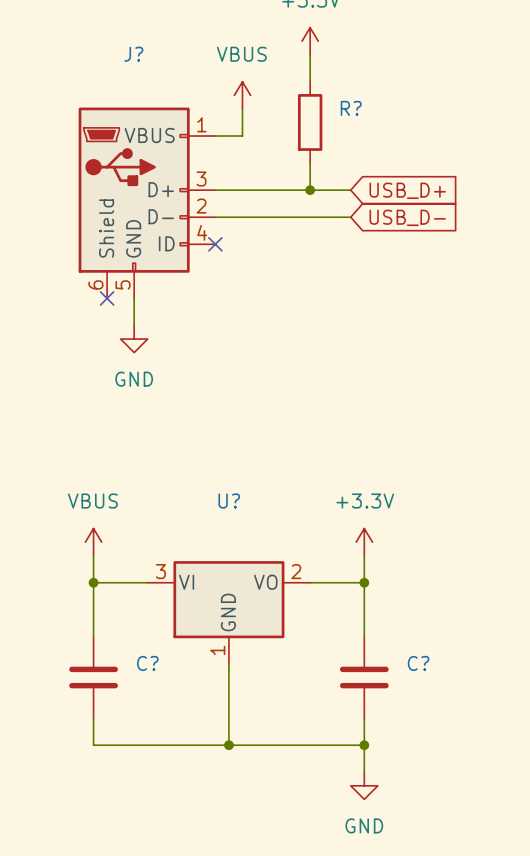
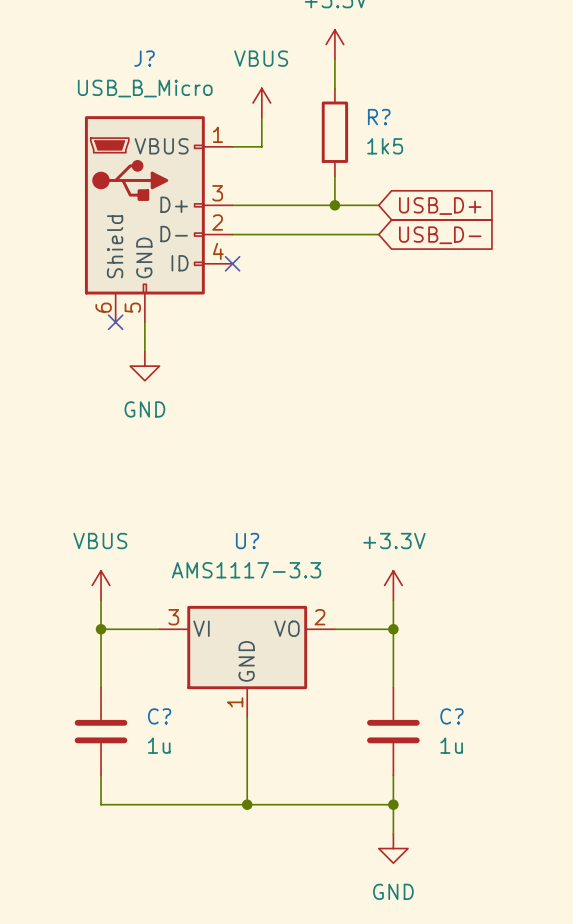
J? value: none -> USB_B_Micro (145, 88)
R? value: none -> 1k5 (385, 146)
U? value: none -> AMS1117-3.3 (246, 570)
C? value: none -> 1u (159, 745)
C? value: none -> 1u (451, 745)

